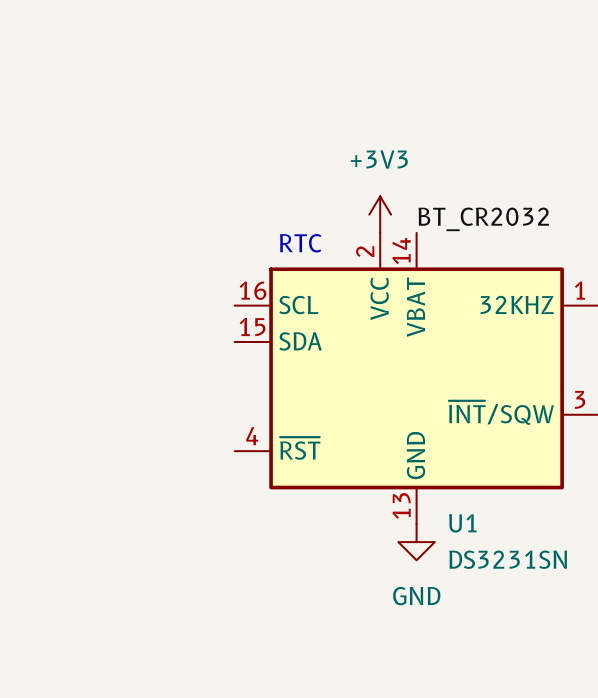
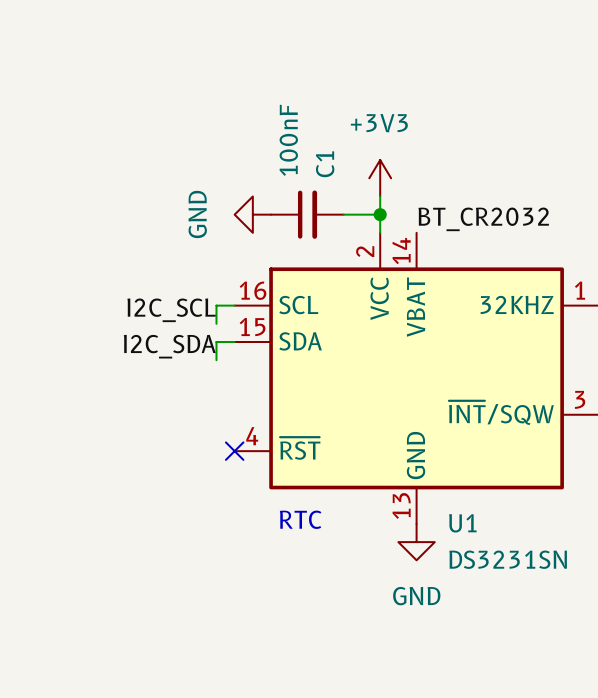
power symbol: none -> GND (252, 214)
C1: none -> 100nF (307, 214)
wire: none -> (343, 214) (380, 214)
power symbol position: +3V3 (380, 214) -> +3V3 (380, 178)
junction: none -> (380, 214)
text position: RTC (300, 243) -> RTC (300, 519)
wire: none -> (234, 305) (216, 305) (216, 323)
label: none -> I2C_SCL (171, 310)
wire: none -> (234, 342) (216, 342) (216, 360)
label: none -> I2C_SDA (169, 346)
no-connect mark: none -> (234, 451)

